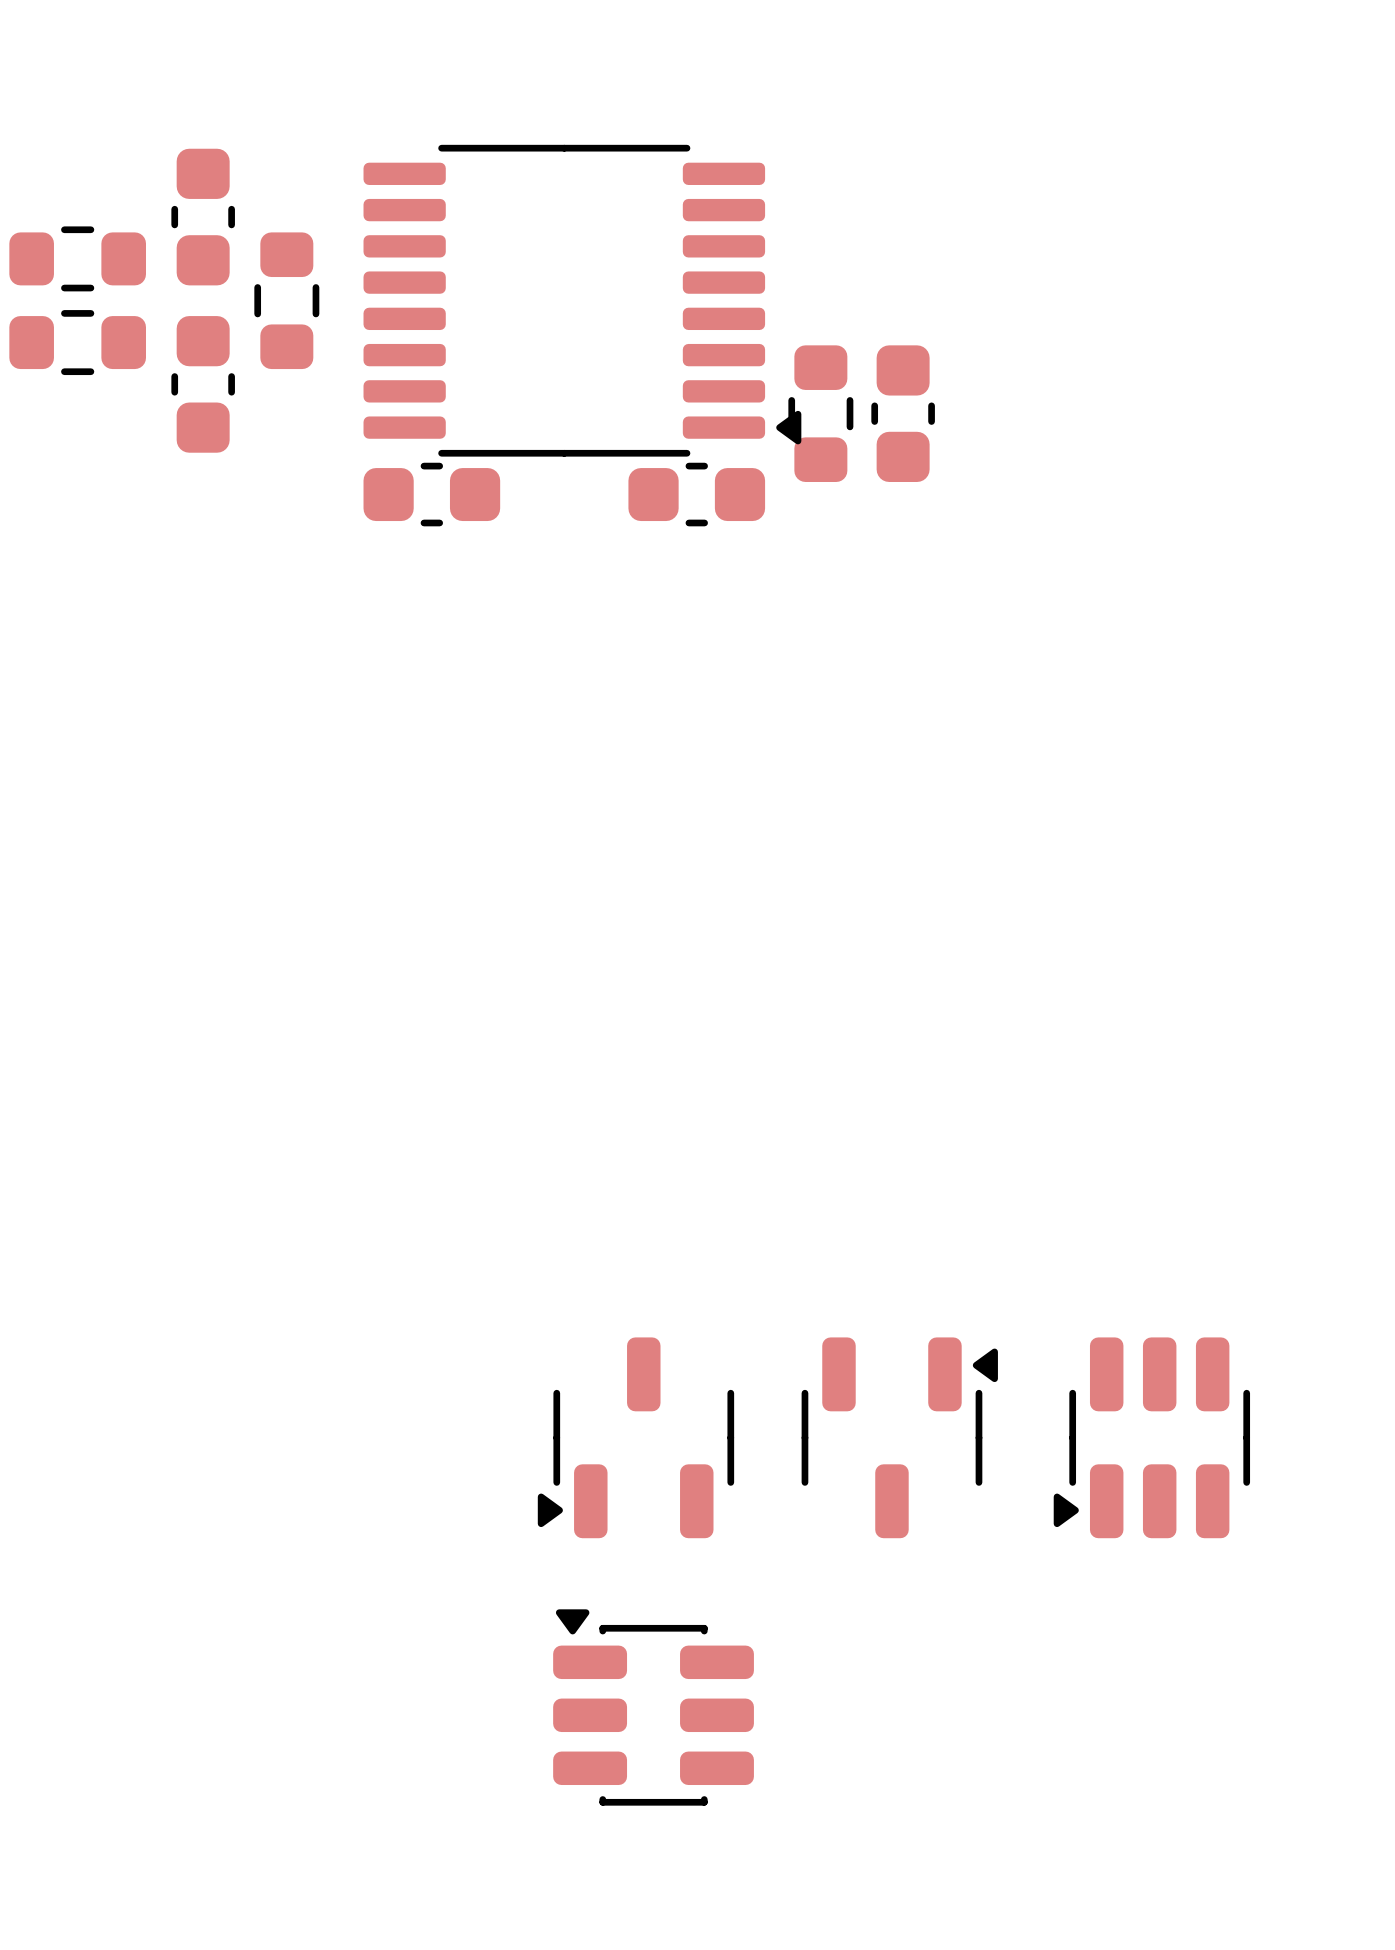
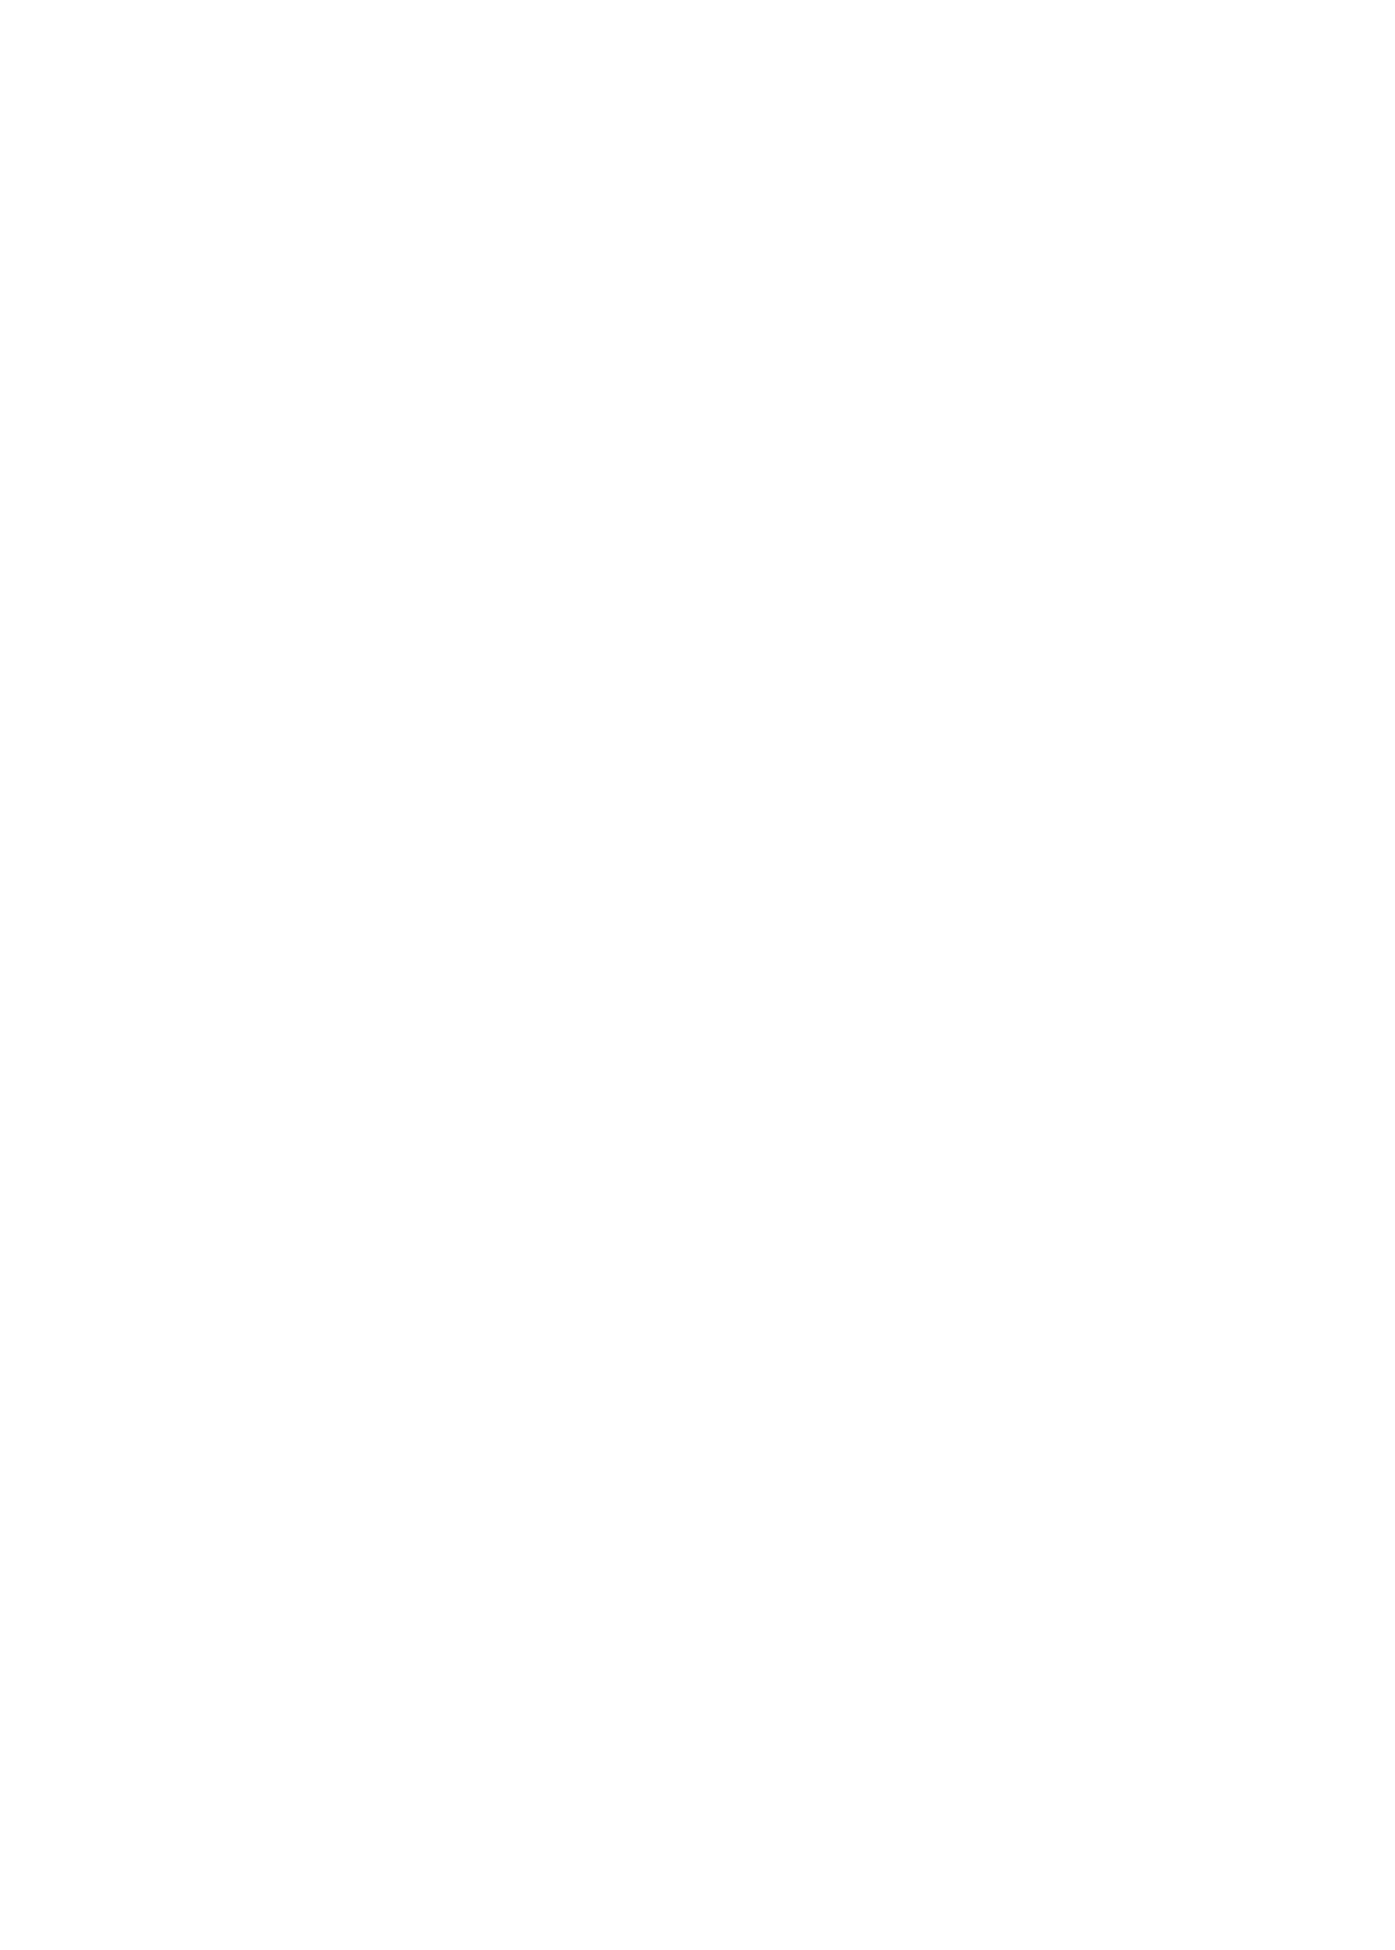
part: (203, 217) -> none
part: (77, 258) -> none
part: (286, 300) -> none
part: (582, 300) -> none
part: (77, 342) -> none
part: (203, 384) -> none
part: (820, 413) -> none
part: (903, 413) -> none
part: (431, 494) -> none
part: (696, 494) -> none
part: (635, 1437) -> none
part: (899, 1437) -> none
part: (1151, 1437) -> none
part: (653, 1707) -> none

